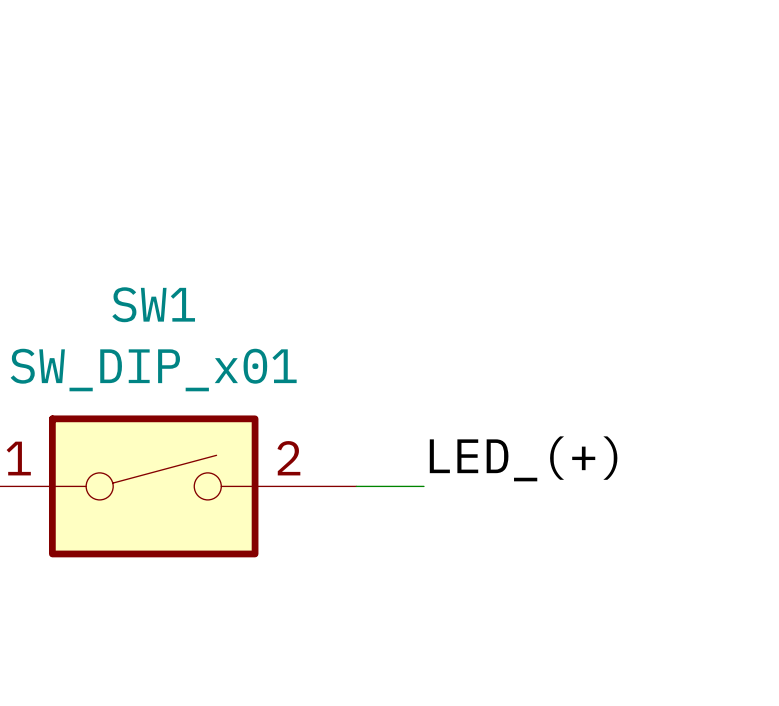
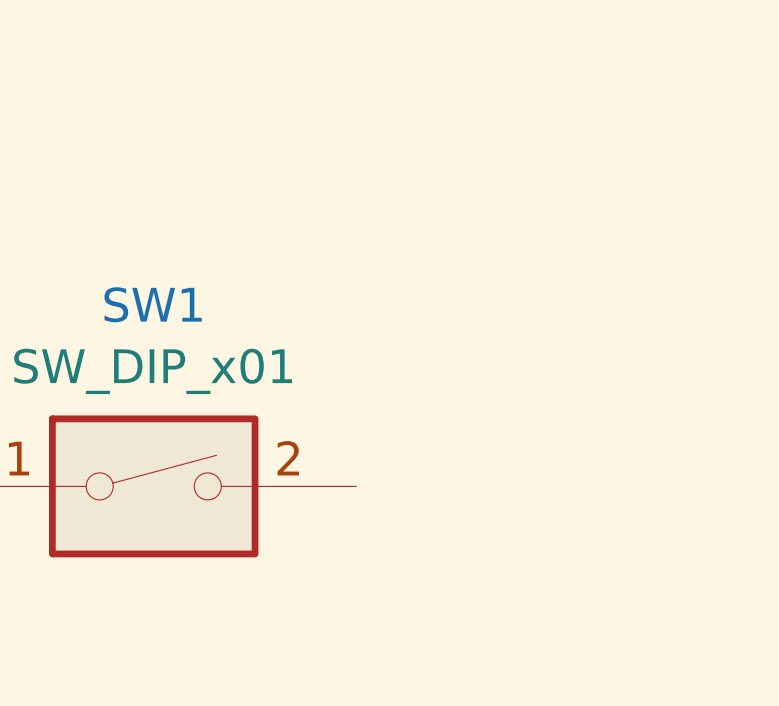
label: LED_(+) (523, 458) -> none
wire: (356, 486) (423, 486) -> none

